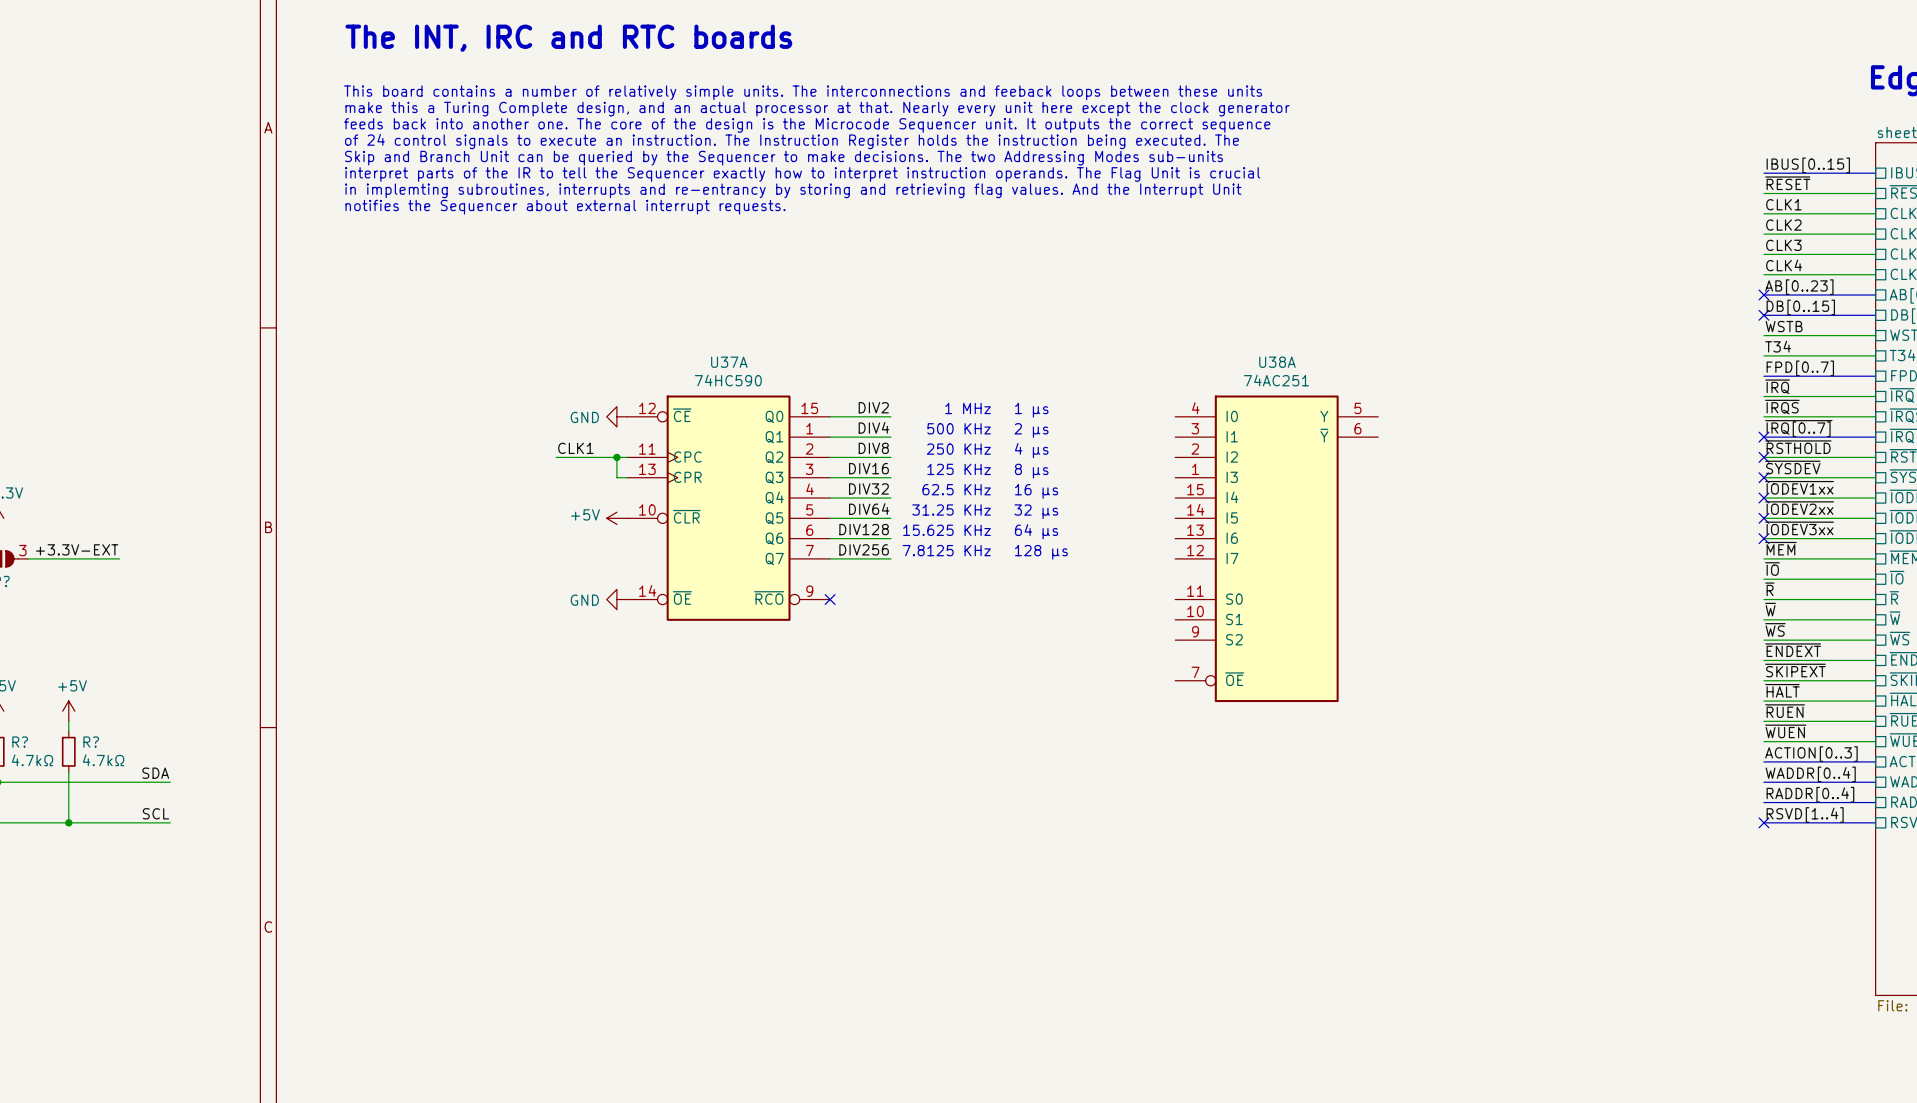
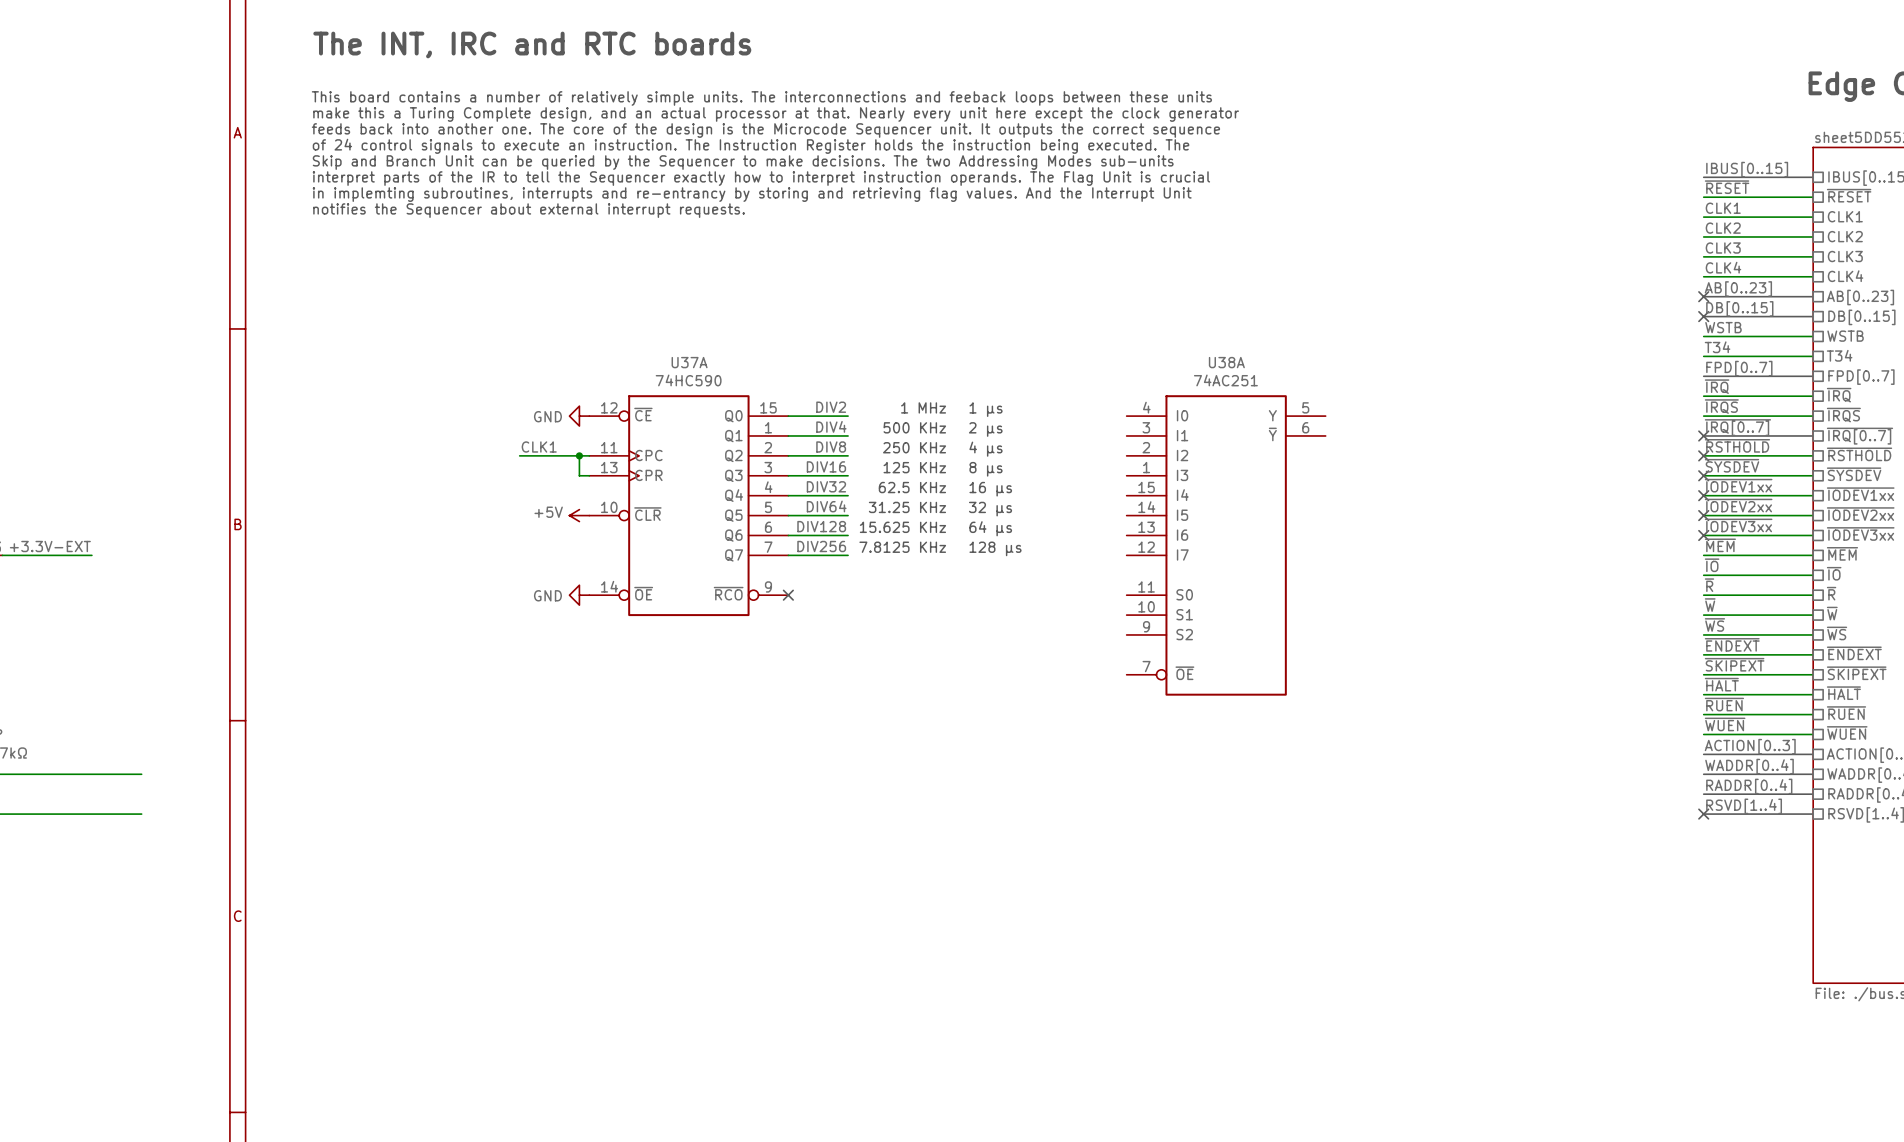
power symbol: +5V (68, 711) -> none
wire: (68, 721) (68, 731) -> none
R?: 4.7kΩ (68, 751) -> none
wire: (68, 772) (68, 822) -> none
label: SDA (155, 773) -> none
label: SCL (155, 813) -> none
junction: (68, 822) -> none

